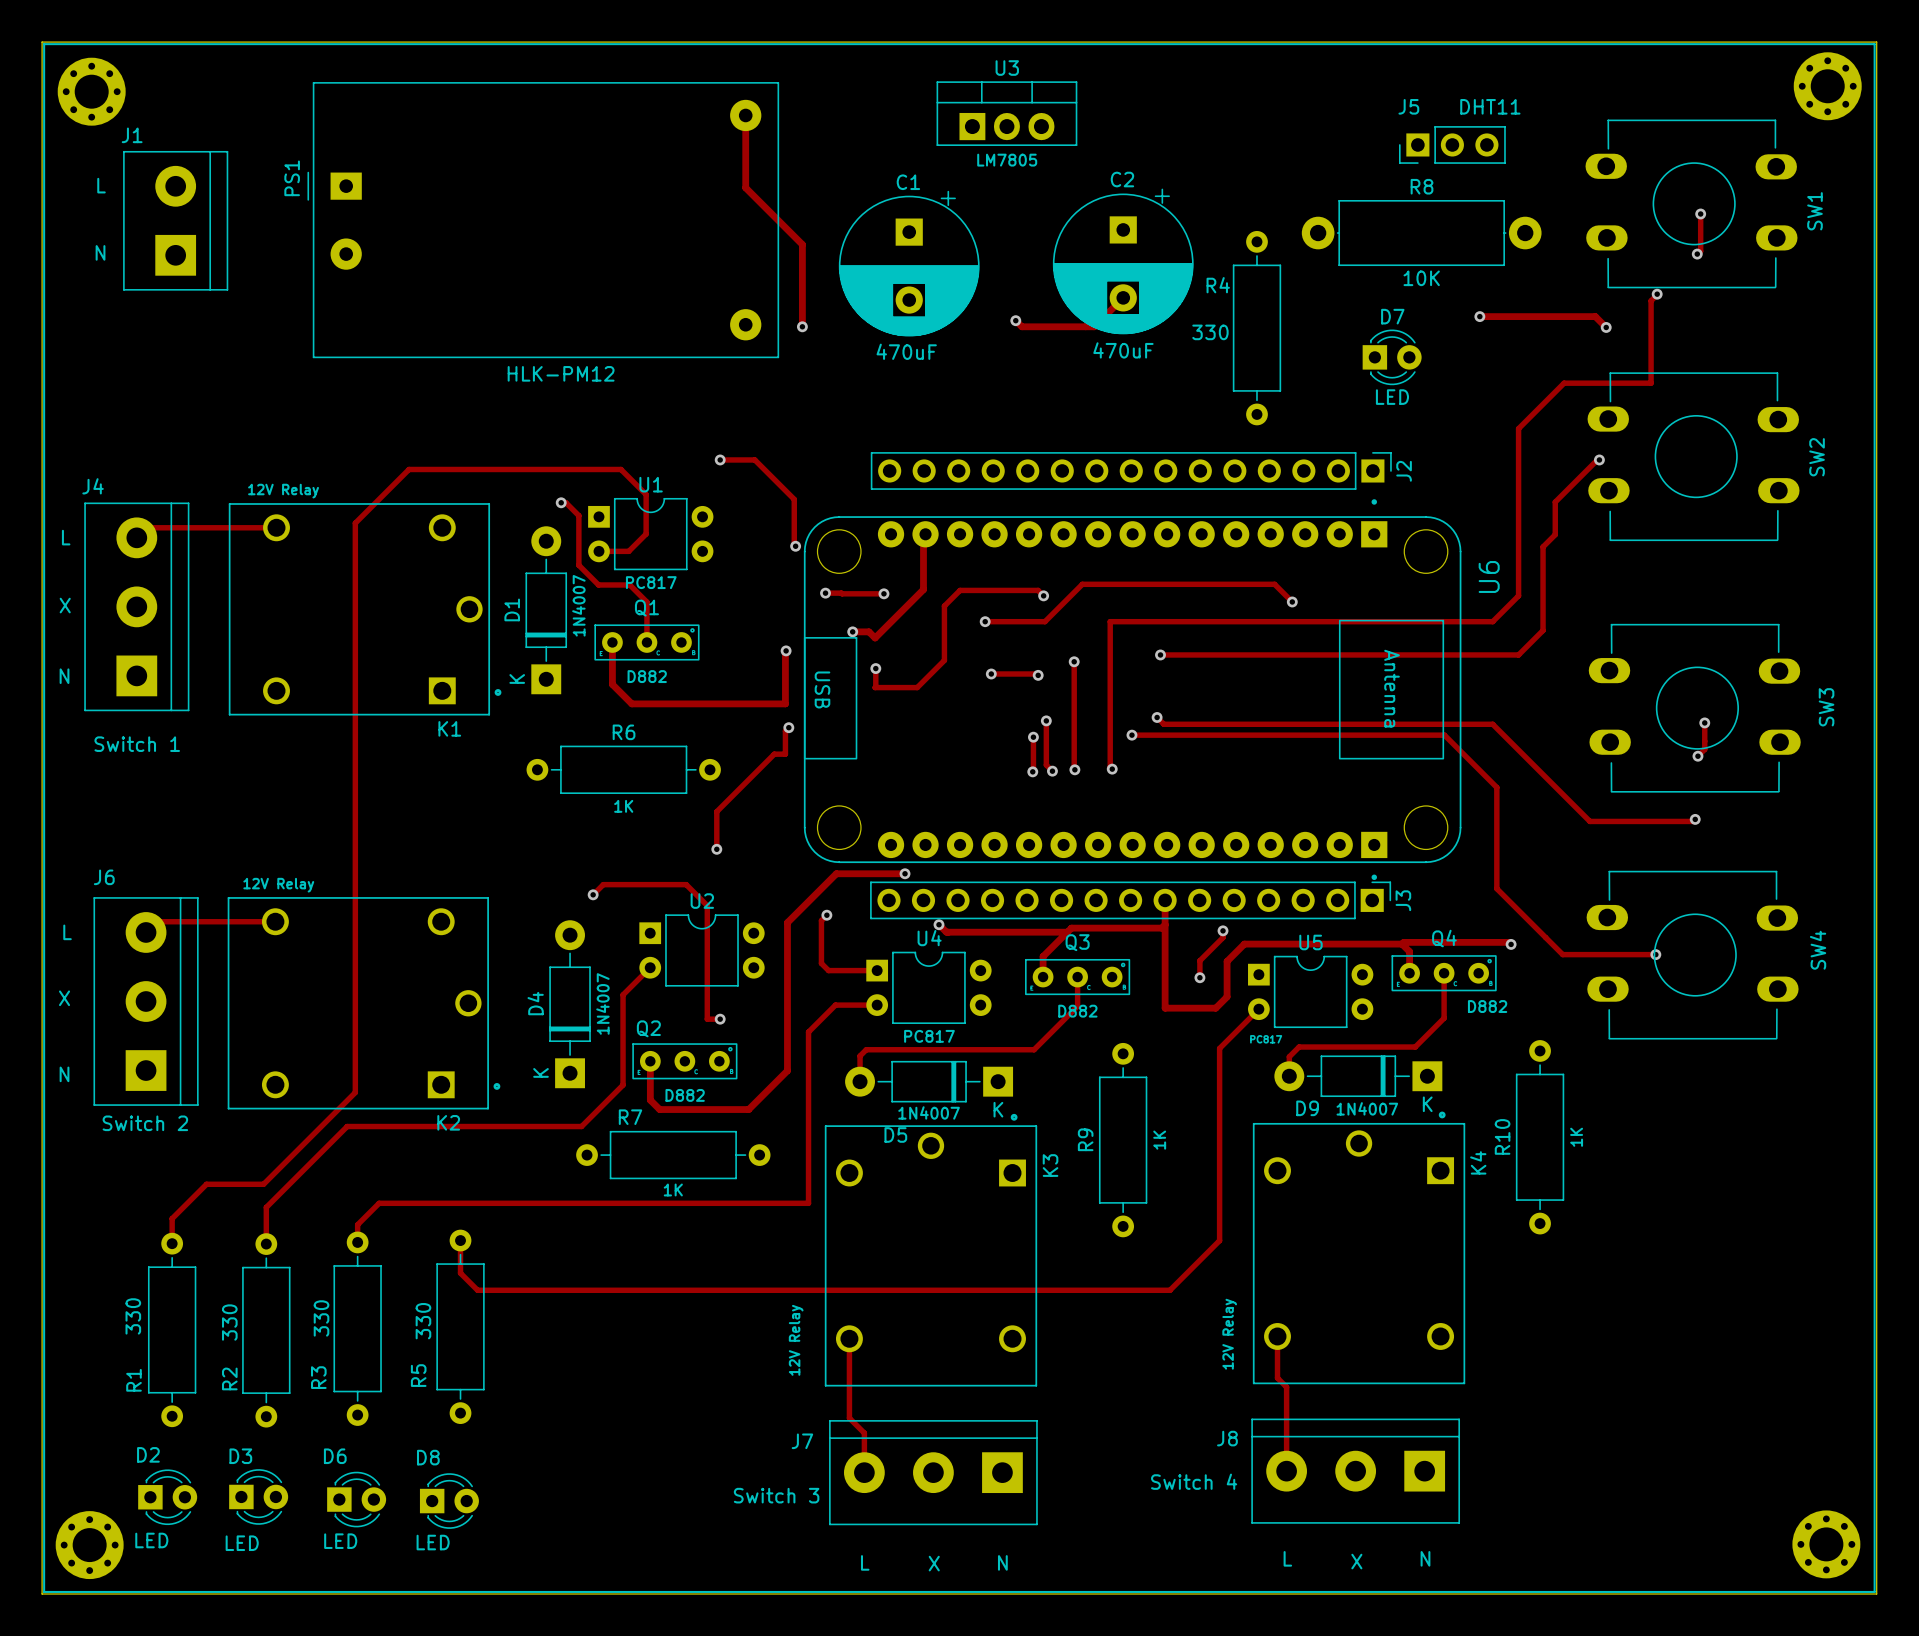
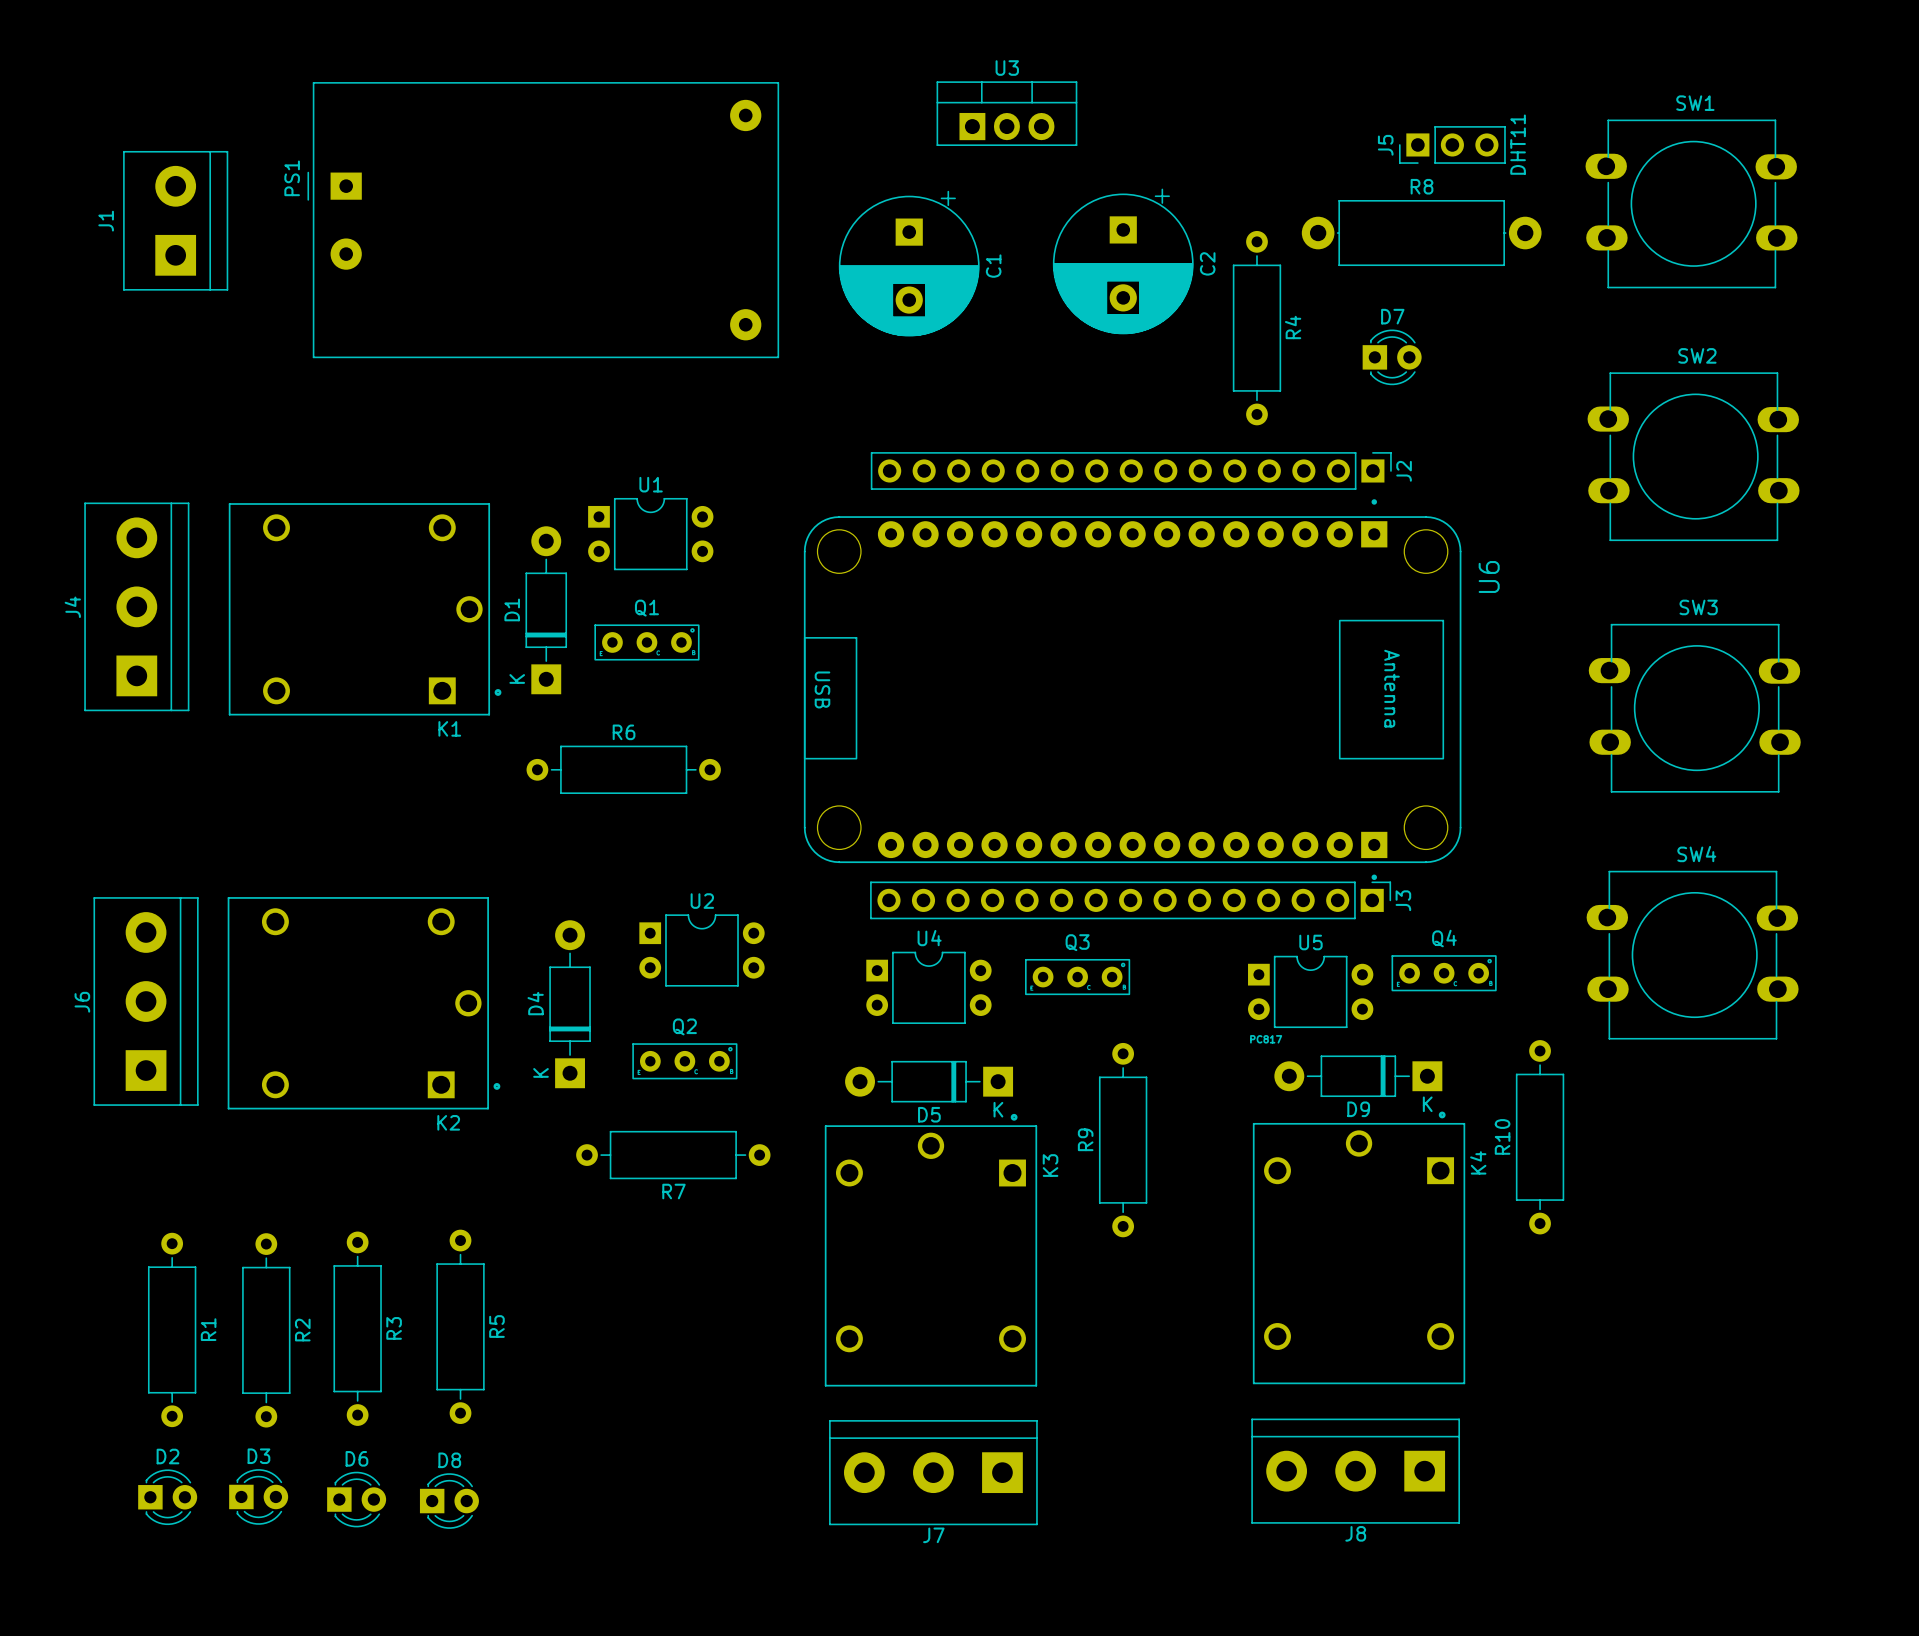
board edge: (42, 42) (1876, 42) (1876, 1594) (42, 1594) (42, 42) -> none
line: (44, 44) (1874, 44) (1874, 1591) (44, 1591) (44, 44) -> none
part: (1827, 86) -> none
part: (91, 91) -> none
J5 name rotation: 0° (1408, 106) -> 90° counterclockwise (1385, 145)
J5 name position: J5 (1408, 106) -> J5 (1385, 145)
J5 value rotation: 0° (1490, 106) -> 90° counterclockwise (1518, 144)
track: (745, 115) (745, 187) (802, 244) (802, 326) -> none
SW1 footprint: [1585, 119, 1798, 289] -> [1585, 119, 1798, 289]
J1 name rotation: 0° (132, 135) -> 90° counterclockwise (106, 221)
J1 name position: J1 (132, 135) -> J1 (106, 221)
U3 value: LM7805 (1007, 160) -> none
C2 name rotation: 0° (1122, 179) -> 90° counterclockwise (1207, 263)
C2 name position: C2 (1122, 179) -> C2 (1207, 263)
C1 name rotation: 0° (908, 182) -> 90° counterclockwise (993, 266)
C1 name position: C1 (908, 182) -> C1 (993, 266)
text: L (101, 185) -> none
SW1 name position: SW1 (1815, 211) -> SW1 (1695, 103)
track: (1700, 214) (1700, 251) (1697, 254) -> none
via: (1700, 214) -> none
text: N (100, 252) -> none
via: (1697, 254) -> none
R8 value: 10K (1421, 278) -> none
R4 name rotation: 0° (1218, 285) -> 90° counterclockwise (1293, 327)
R4 name position: R4 (1218, 285) -> R4 (1293, 327)
track: (1657, 294) (1651, 300) (1651, 383) (1564, 383) (1518, 428) (1518, 595) (1492, 621) (1110, 621) (1110, 767) (1112, 769) -> none
via: (1657, 294) -> none
track: (1123, 297) (1094, 326) (1021, 326) (1015, 320) -> none
track: (1479, 316) (1595, 316) (1606, 327) -> none
via: (1479, 316) -> none
via: (1015, 320) -> none
via: (802, 326) -> none
via: (1606, 327) -> none
R4 value: 330 (1210, 332) -> none
C2 value: 470uF (1123, 350) -> none
C1 value: 470uF (906, 351) -> none
SW2 footprint: [1587, 372, 1800, 542] -> [1587, 372, 1800, 542]
PS1 value: HLK-PM12 (561, 373) -> none
D7 value: LED (1392, 397) -> none
SW2 name position: SW2 (1817, 457) -> SW2 (1697, 355)
track: (720, 459) (754, 459) (794, 499) (795, 546) -> none
via: (720, 459) -> none
track: (1599, 459) (1555, 502) (1555, 534) (1543, 546) (1543, 630) (1518, 654) (1160, 654) -> none
via: (1599, 459) -> none
J4 name rotation: 0° (93, 486) -> 90° counterclockwise (72, 607)
J4 name position: J4 (93, 486) -> J4 (72, 607)
K1 value: 12V Relay (283, 491) -> none
track: (561, 502) (565, 502) (578, 515) (578, 565) (598, 584) (629, 584) (646, 602) (646, 642) -> none
via: (561, 502) -> none
track: (276, 527) (146, 527) (136, 537) -> none
track: (925, 534) (923, 536) (923, 589) (875, 637) (869, 631) (852, 631) -> none
text: L (66, 537) -> none
via: (795, 546) -> none
track: (598, 551) (628, 551) (646, 534) (646, 494) (621, 469) (409, 469) (355, 523) (355, 1092) (263, 1184) (206, 1184) (172, 1218) (172, 1243) -> none
U1 value: PC817 (651, 582) -> none
track: (825, 593) (883, 593) -> none
via: (825, 593) -> none
via: (883, 593) -> none
track: (1043, 595) (1038, 590) (960, 590) (944, 606) (944, 660) (917, 687) (875, 687) (875, 668) -> none
via: (1043, 595) -> none
track: (1292, 601) (1274, 584) (1082, 584) (1044, 621) (985, 621) -> none
via: (1292, 601) -> none
text: X (65, 605) -> none
D1 value: 1N4007 (578, 605) -> none
via: (985, 621) -> none
SW3 footprint: [1588, 623, 1801, 793] -> [1588, 623, 1801, 793]
via: (852, 631) -> none
track: (612, 642) (612, 684) (631, 703) (785, 703) (786, 650) -> none
via: (786, 650) -> none
via: (1160, 654) -> none
track: (1074, 661) (1074, 769) -> none
via: (1074, 661) -> none
via: (875, 668) -> none
track: (991, 674) (1038, 675) -> none
via: (991, 674) -> none
via: (1038, 675) -> none
text: N (64, 676) -> none
Q1 value: D882 (647, 676) -> none
SW3 name position: SW3 (1826, 707) -> SW3 (1698, 607)
track: (1157, 717) (1163, 724) (1492, 724) (1589, 821) (1693, 821) (1695, 819) -> none
via: (1157, 717) -> none
track: (1046, 720) (1046, 765) (1052, 771) -> none
via: (1046, 720) -> none
track: (1704, 722) (1704, 749) (1697, 756) -> none
via: (1704, 722) -> none
track: (788, 727) (785, 731) (785, 754) (774, 754) (716, 811) (716, 849) -> none
via: (788, 727) -> none
track: (1131, 735) (1444, 735) (1496, 787) (1496, 888) (1562, 954) (1655, 954) -> none
via: (1131, 735) -> none
track: (1033, 737) (1032, 771) -> none
via: (1033, 737) -> none
text: Switch 1 (137, 744) -> none
via: (1697, 756) -> none
via: (1074, 769) -> none
via: (1112, 769) -> none
via: (1032, 771) -> none
via: (1052, 771) -> none
R6 value: 1K (623, 806) -> none
via: (1695, 819) -> none
via: (716, 849) -> none
SW4 footprint: [1586, 870, 1799, 1040] -> [1586, 870, 1799, 1040]
track: (905, 873) (836, 873) (787, 922) (787, 1070) (748, 1109) (659, 1109) (650, 1100) (650, 1061) -> none
via: (905, 873) -> none
J6 name rotation: 0° (104, 877) -> 90° counterclockwise (82, 1002)
J6 name position: J6 (104, 877) -> J6 (82, 1002)
K2 value: 12V Relay (278, 885) -> none
track: (593, 894) (603, 884) (686, 884) (707, 905) (707, 1019) (720, 1019) -> none
via: (593, 894) -> none
track: (1165, 900) (1165, 1008) (1215, 1008) (1227, 996) (1227, 961) (1244, 944) (1402, 944) -> none
track: (826, 915) (821, 920) (821, 963) (828, 970) (877, 970) -> none
via: (826, 915) -> none
track: (275, 921) (156, 921) (146, 932) -> none
track: (938, 924) (946, 932) (1067, 932) -> none
via: (938, 924) -> none
track: (1165, 924) (1161, 928) (1071, 928) (1043, 956) (1043, 977) -> none
track: (1223, 930) (1223, 937) (1199, 960) (1199, 977) -> none
via: (1223, 930) -> none
text: L (67, 932) -> none
track: (1402, 944) (1409, 951) (1409, 973) -> none
track: (1402, 944) (1403, 942) (1509, 942) (1511, 944) -> none
via: (1511, 944) -> none
SW4 name position: SW4 (1818, 950) -> SW4 (1696, 854)
via: (1655, 954) -> none
track: (650, 967) (623, 994) (623, 1085) (581, 1126) (347, 1126) (266, 1207) (266, 1244) -> none
track: (1444, 973) (1444, 1018) (1415, 1047) (1299, 1047) (1289, 1056) (1289, 1076) -> none
track: (1077, 977) (1077, 1006) (1034, 1049) (866, 1049) (860, 1056) (860, 1081) -> none
via: (1199, 977) -> none
text: X (64, 998) -> none
D4 value: 1N4007 (602, 1003) -> none
track: (877, 1005) (835, 1005) (808, 1032) (808, 1203) (379, 1203) (357, 1224) (357, 1242) -> none
Q4 value: D882 (1487, 1006) -> none
track: (1258, 1009) (1219, 1048) (1219, 1240) (1170, 1290) (477, 1290) (460, 1273) (460, 1240) -> none
Q3 value: D882 (1077, 1011) -> none
via: (720, 1019) -> none
Q2 name position: Q2 (648, 1028) -> Q2 (684, 1026)
U4 value: PC817 (929, 1036) -> none
text: N (64, 1074) -> none
Q2 value: D882 (685, 1095) -> none
D9 name position: D9 (1307, 1108) -> D9 (1358, 1109)
D9 value: 1N4007 (1367, 1108) -> none
D5 value: 1N4007 (929, 1112) -> none
R7 name position: R7 (630, 1117) -> R7 (673, 1191)
text: Switch 2 (145, 1123) -> none
D5 name position: D5 (895, 1134) -> D5 (929, 1114)
R10 value: 1K (1576, 1137) -> none
R9 value: 1K (1159, 1140) -> none
R7 value: 1K (673, 1189) -> none
R1 value: 330 (133, 1316) -> none
R3 value: 330 (321, 1318) -> none
R5 value: 330 (423, 1321) -> none
R2 value: 330 (229, 1322) -> none
K4 value: 12V Relay (1229, 1334) -> none
track: (1277, 1336) (1277, 1378) (1286, 1387) (1286, 1471) -> none
track: (849, 1338) (849, 1418) (864, 1433) (864, 1472) -> none
K3 value: 12V Relay (796, 1340) -> none
R5 name position: R5 (418, 1375) -> R5 (496, 1326)
R3 name position: R3 (318, 1377) -> R3 (394, 1328)
R2 name position: R2 (229, 1378) -> R2 (302, 1330)
R1 name position: R1 (133, 1380) -> R1 (208, 1329)
J8 name position: J8 (1227, 1438) -> J8 (1355, 1533)
J7 name position: J7 (802, 1441) -> J7 (933, 1535)
D2 name position: D2 (148, 1454) -> D2 (167, 1456)
D3 name position: D3 (240, 1456) -> D3 (258, 1456)
D6 name position: D6 (335, 1456) -> D6 (356, 1458)
D8 name position: D8 (428, 1457) -> D8 (449, 1460)
text: Switch 4 (1194, 1481) -> none
text: Switch 3 (776, 1495) -> none
D2 value: LED (151, 1540) -> none
D6 value: LED (340, 1541) -> none
D8 value: LED (433, 1542) -> none
D3 value: LED (242, 1543) -> none
part: (1826, 1544) -> none
part: (89, 1545) -> none
text: L (1287, 1558) -> none
text: N (1425, 1558) -> none
text: X (1356, 1561) -> none
text: L (865, 1562) -> none
text: N (1002, 1562) -> none
text: X (934, 1563) -> none

